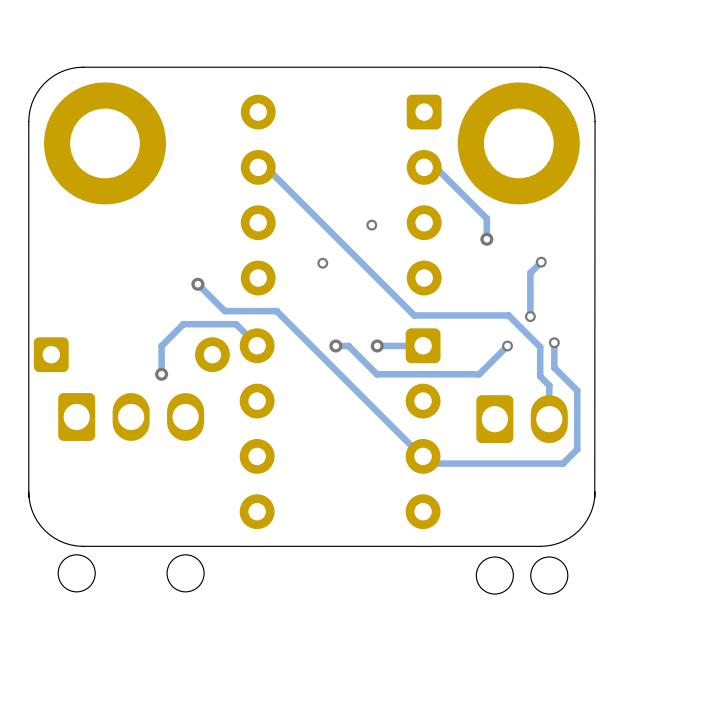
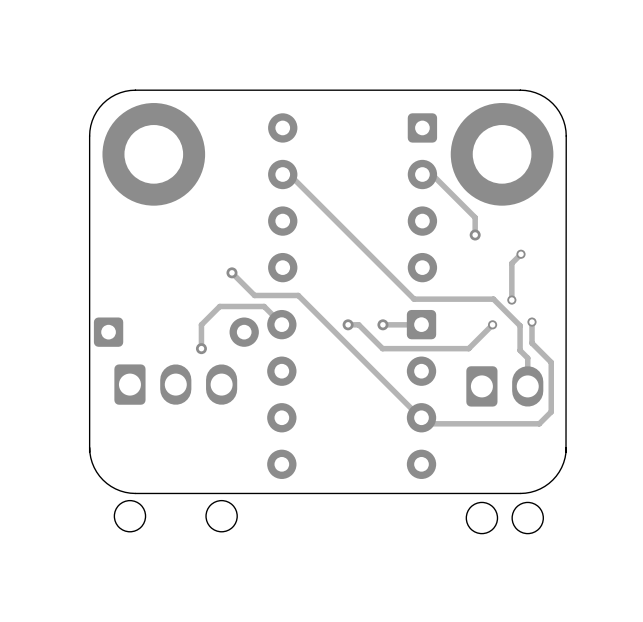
via: (371, 225) -> none
via: (322, 263) -> none

